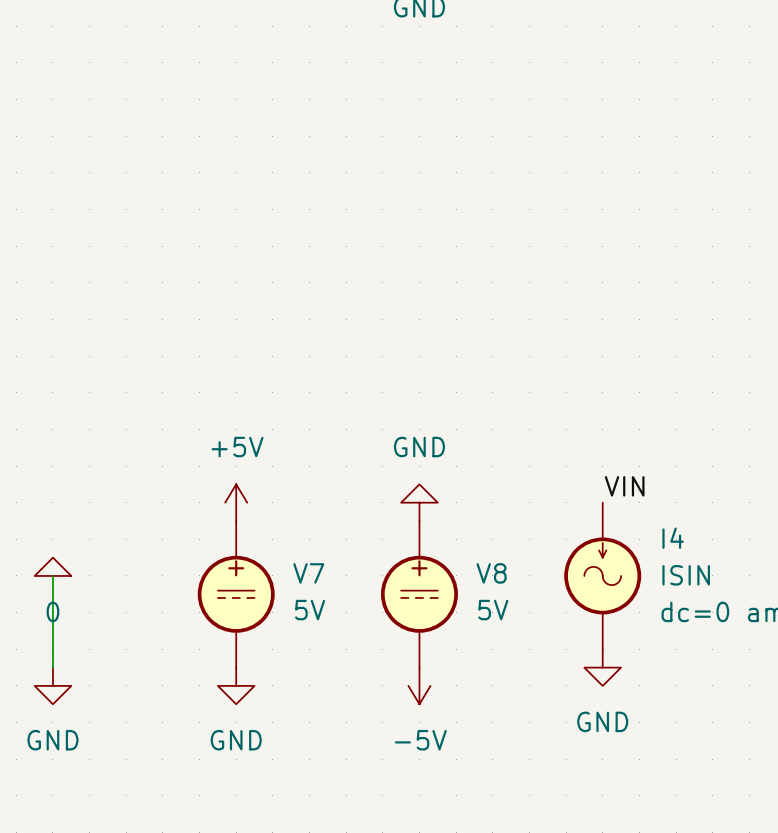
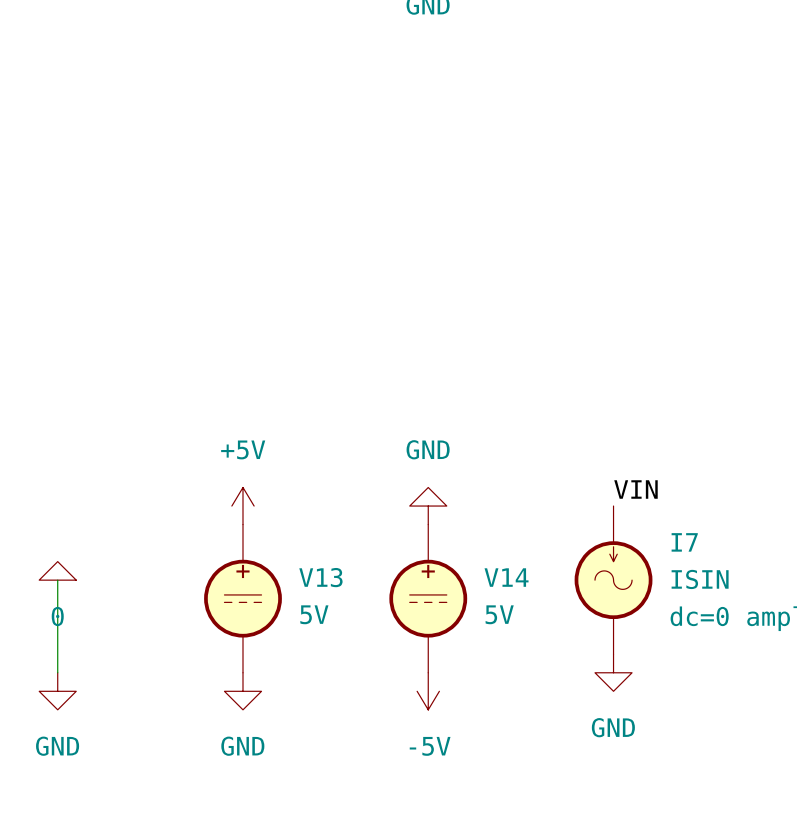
I4 name: I4 (673, 538) -> I7 (684, 542)
V7 name: V7 (308, 573) -> V13 (320, 577)
V8 name: V8 (491, 573) -> V14 (506, 577)

